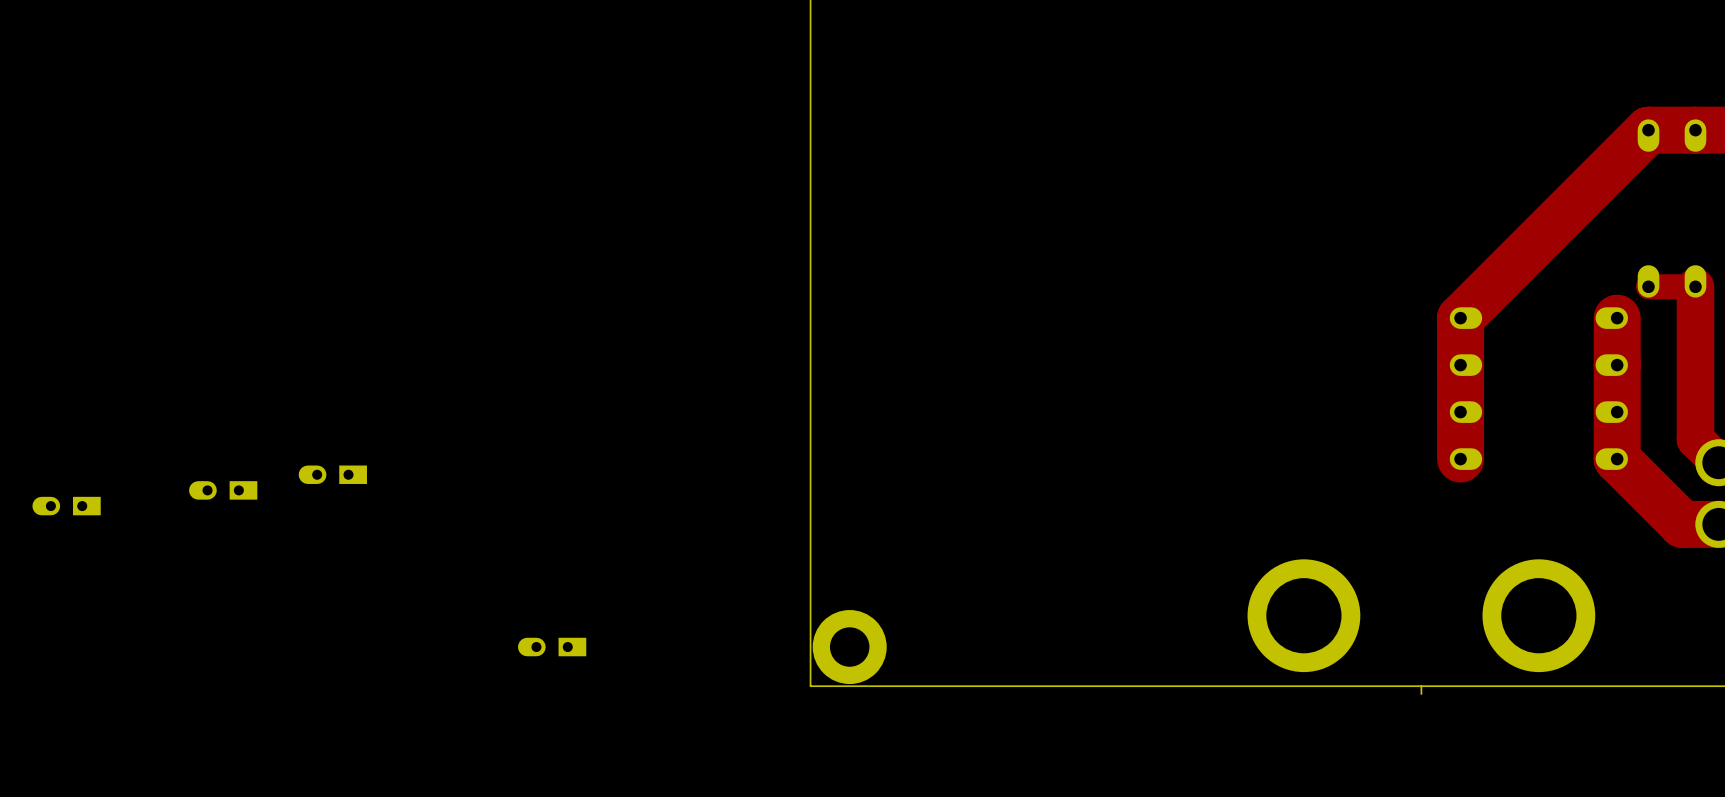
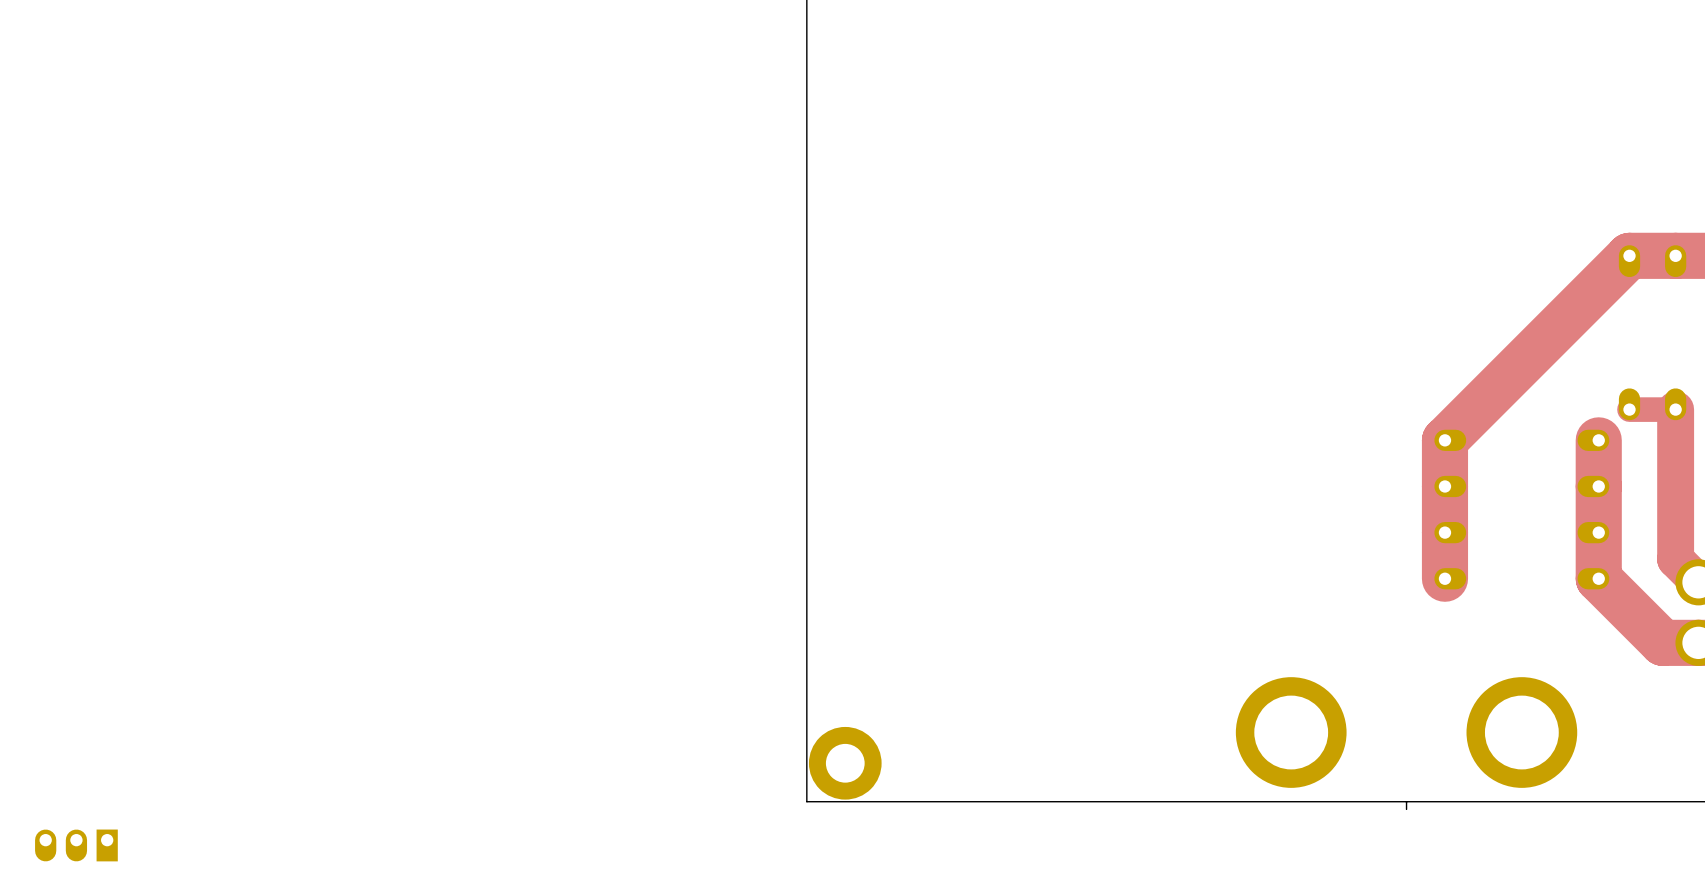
part: (332, 474) -> none
part: (223, 490) -> none
part: (66, 506) -> none
part: (552, 647) -> none
part: none -> (76, 845)

